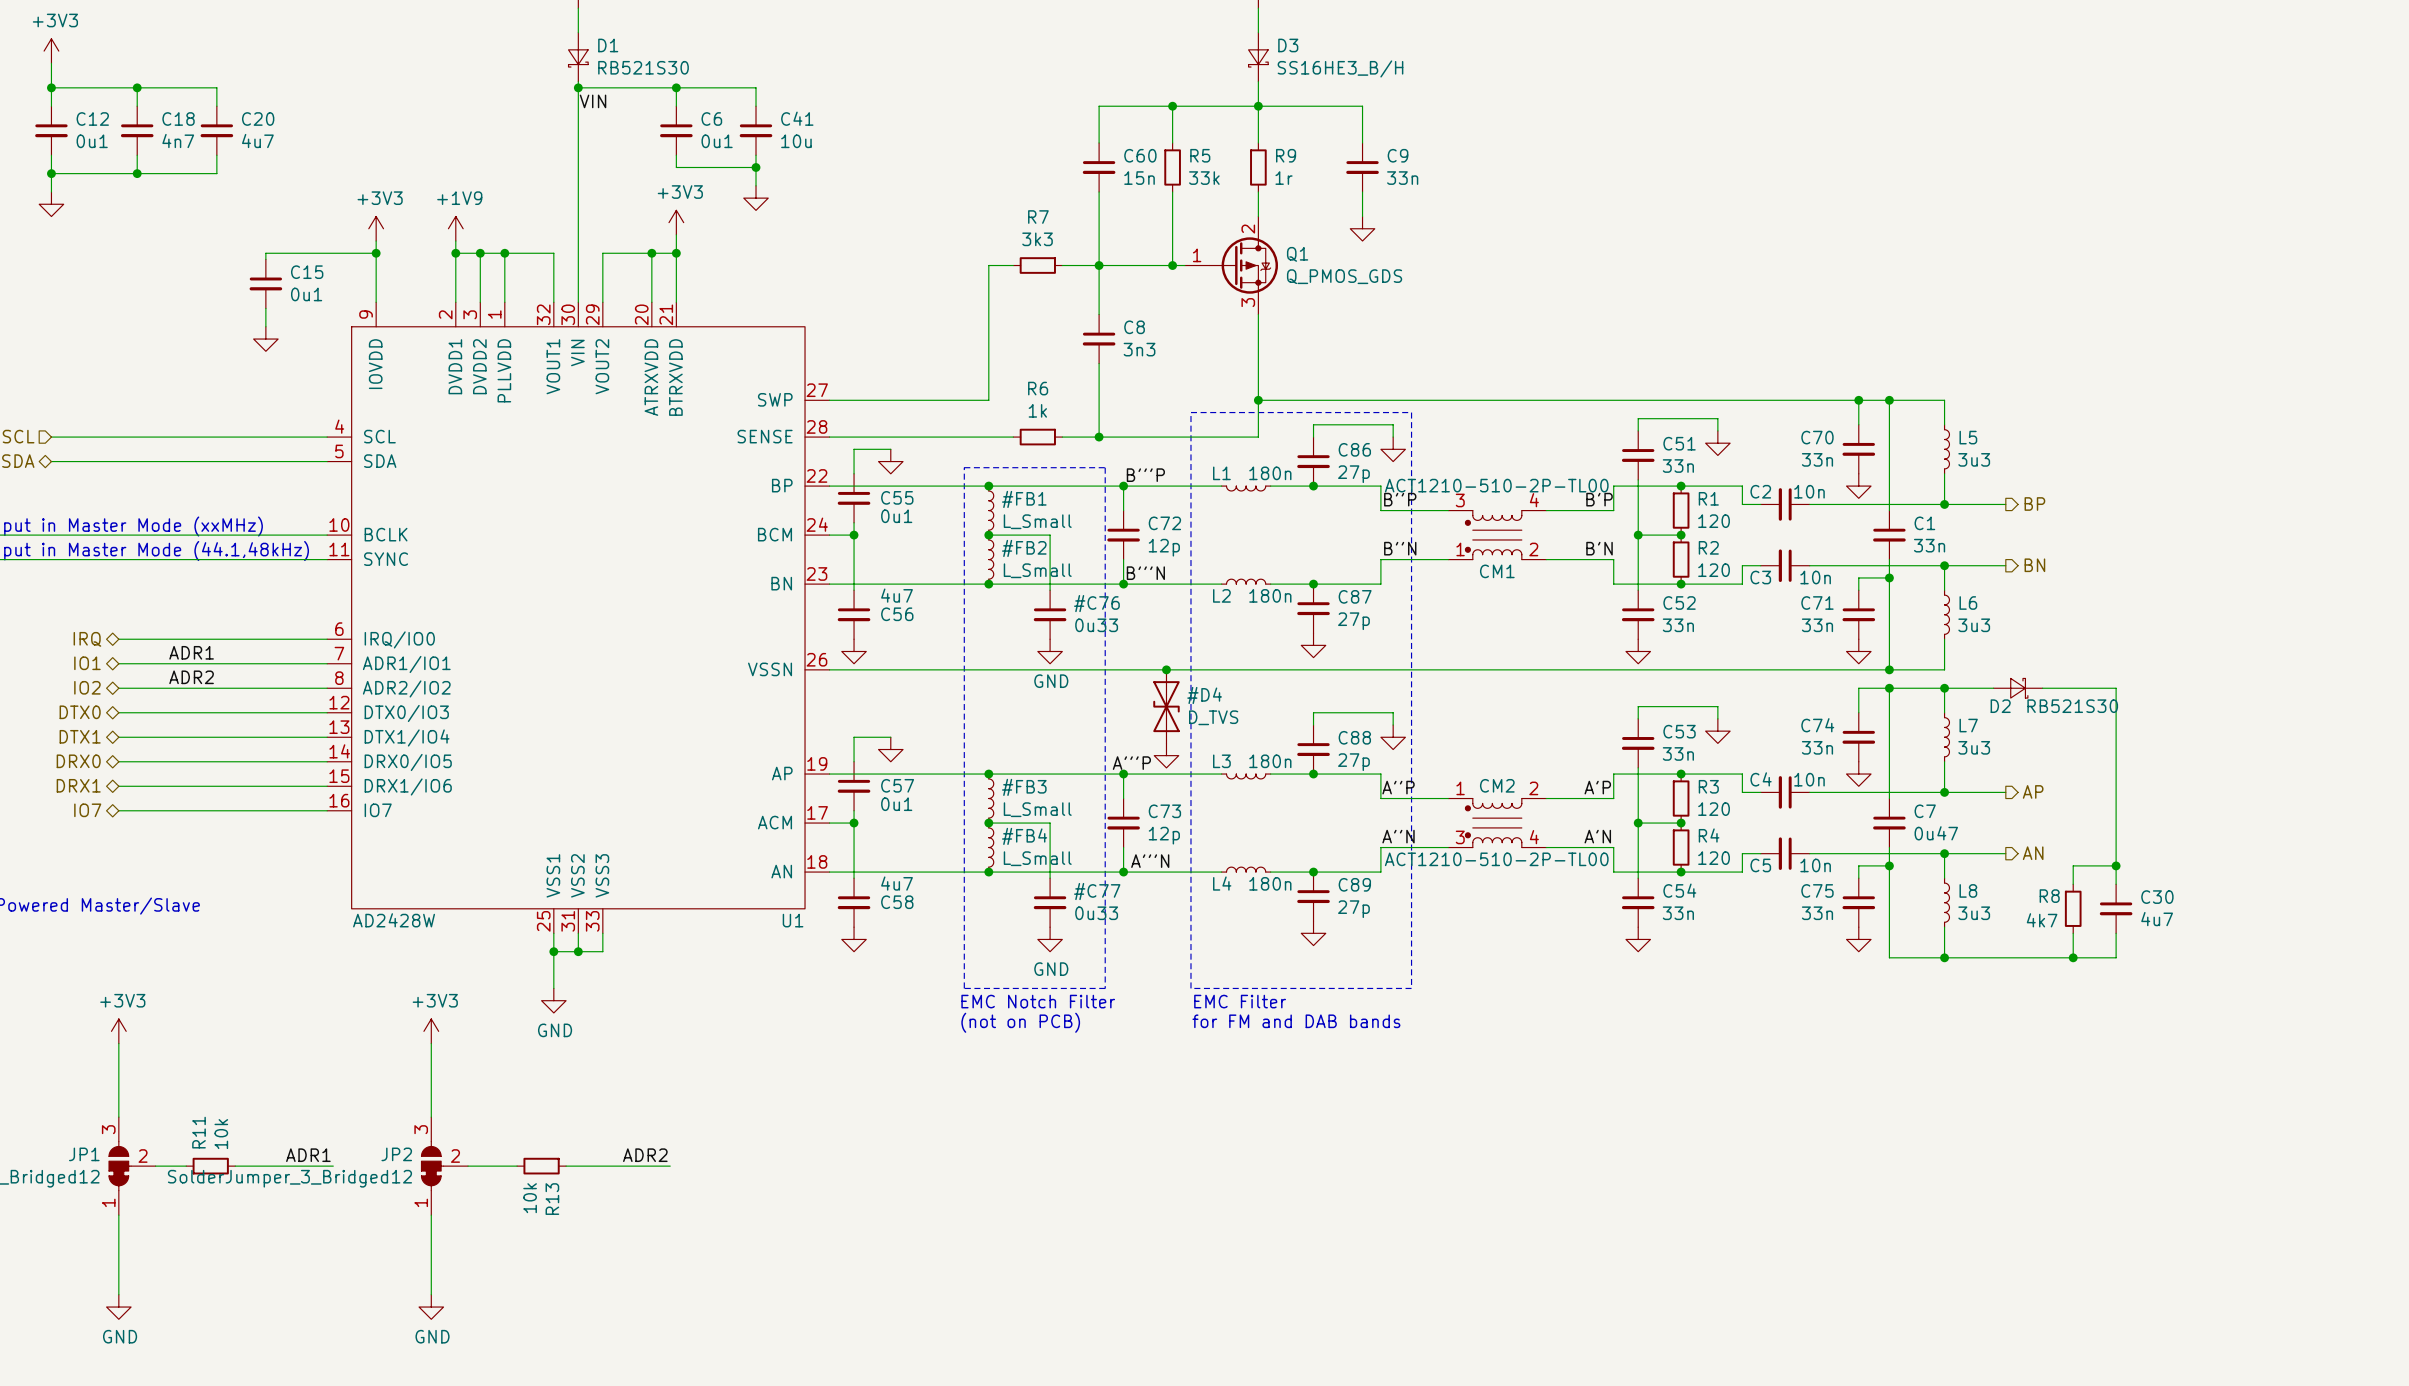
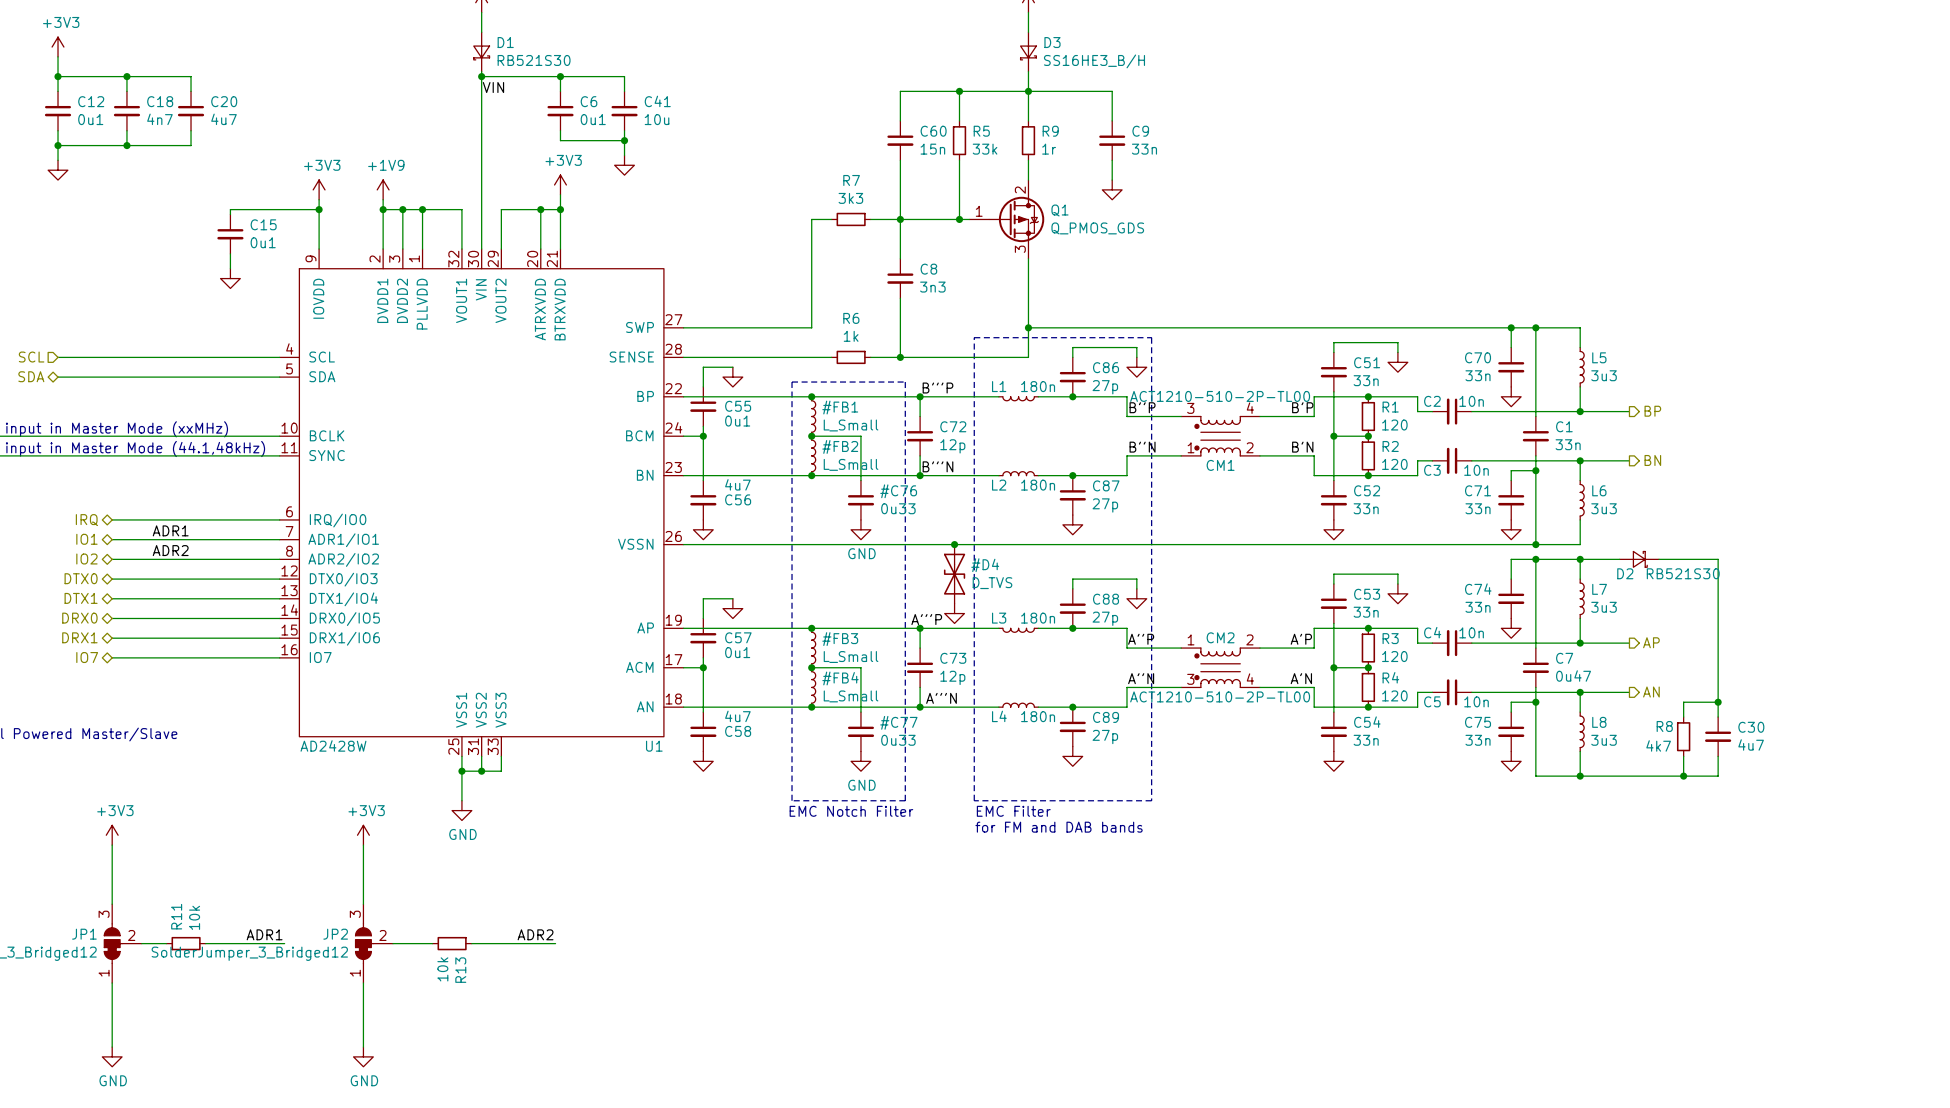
text: (not on PCB) (1020, 1022) -> none

